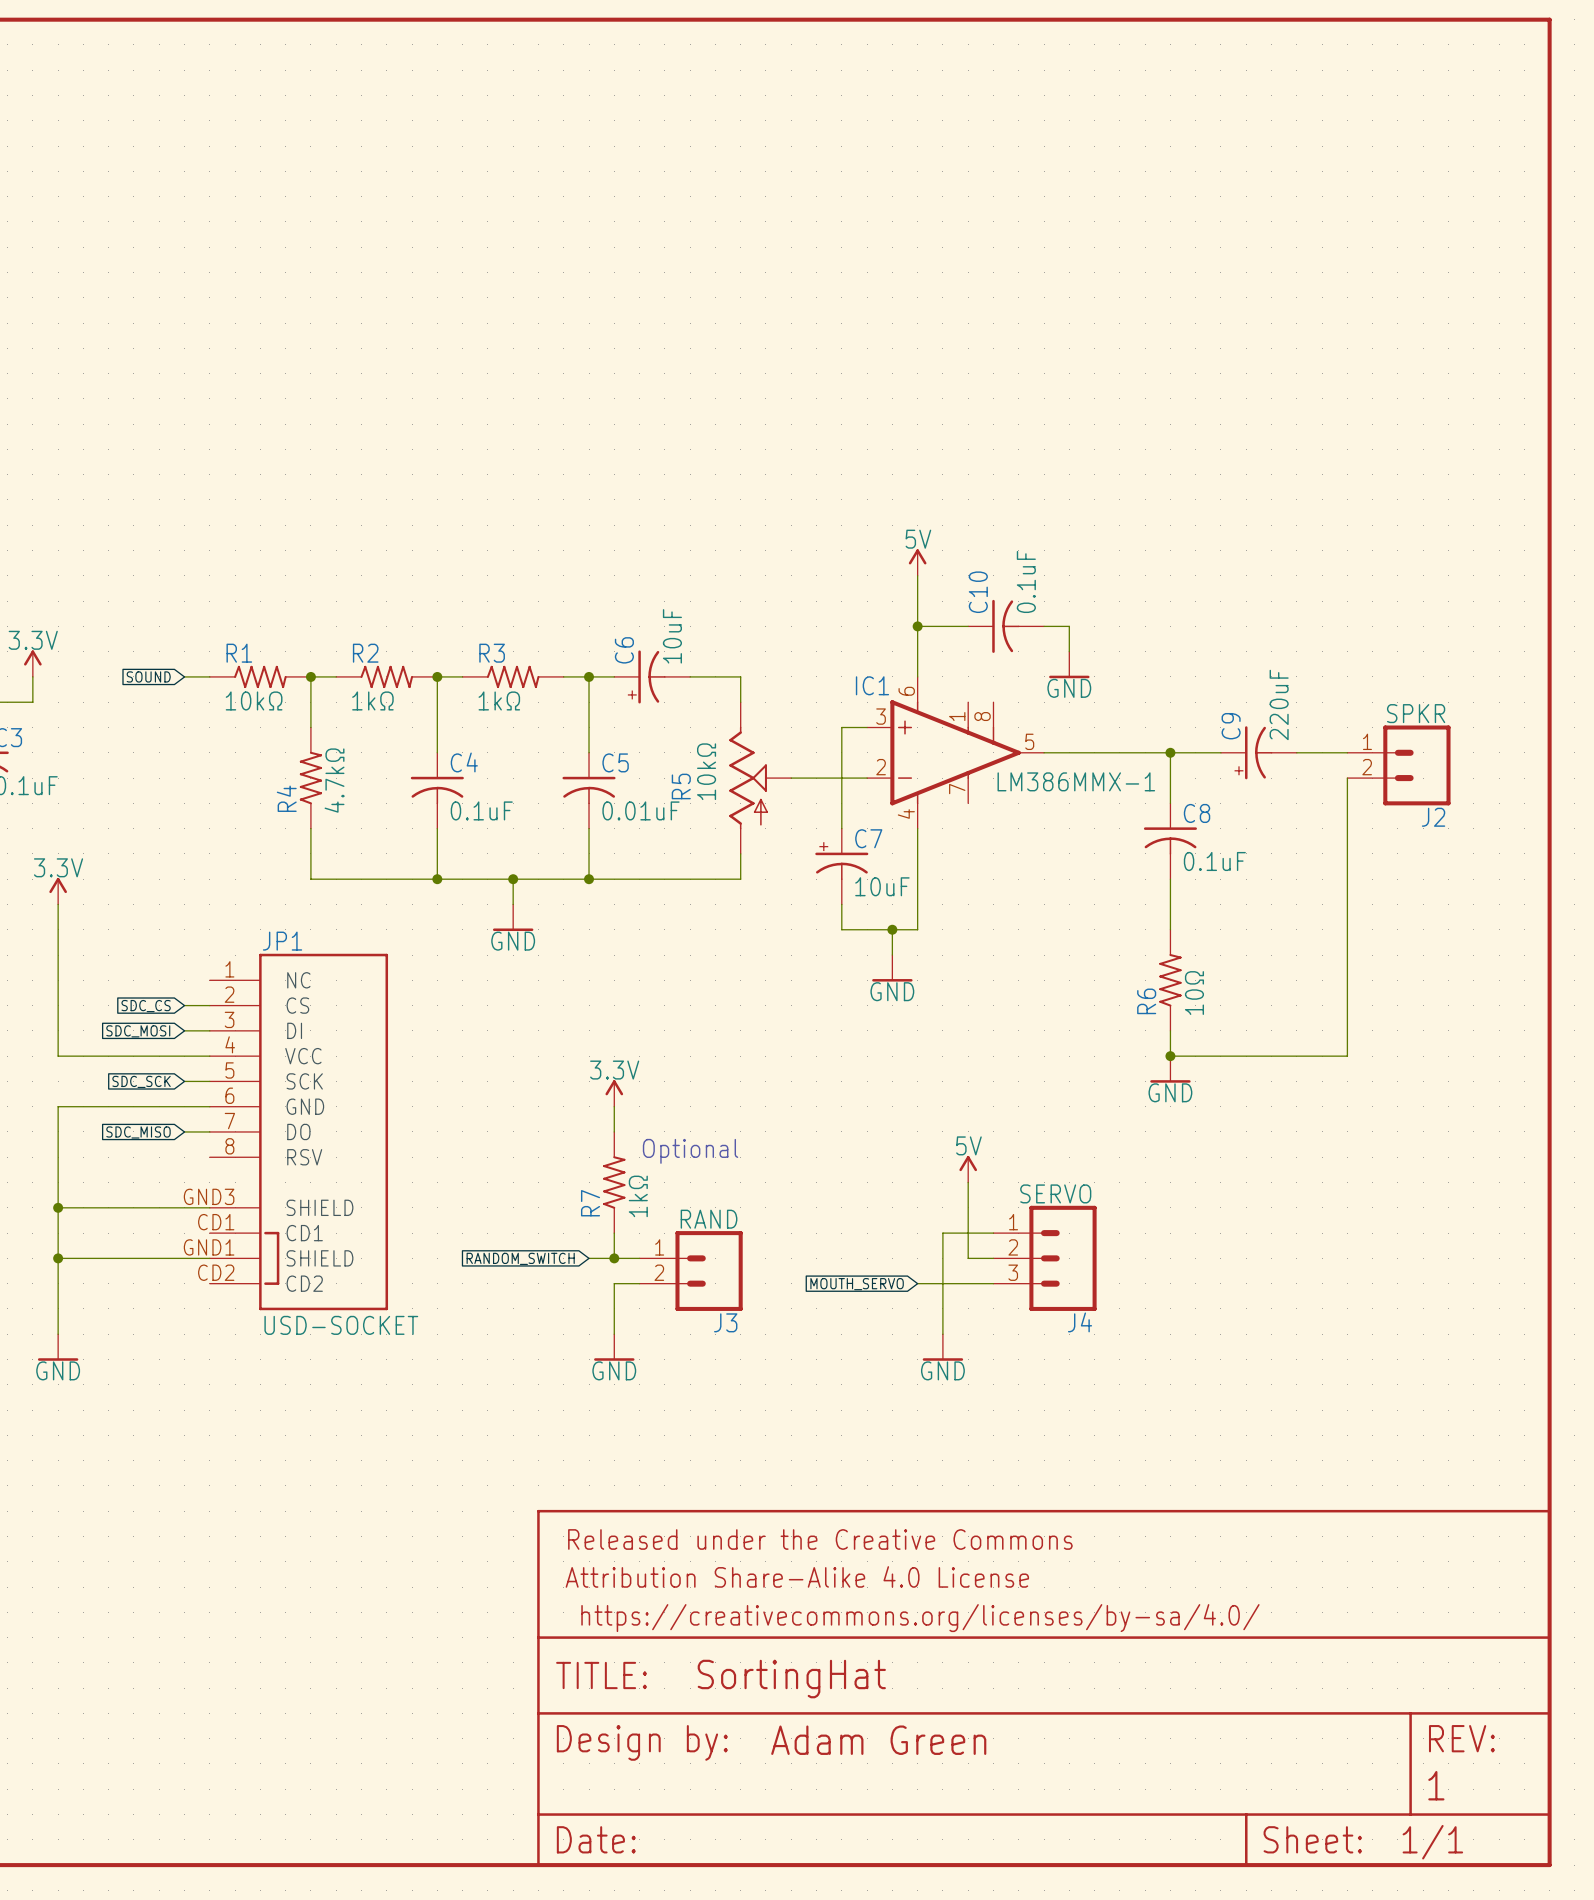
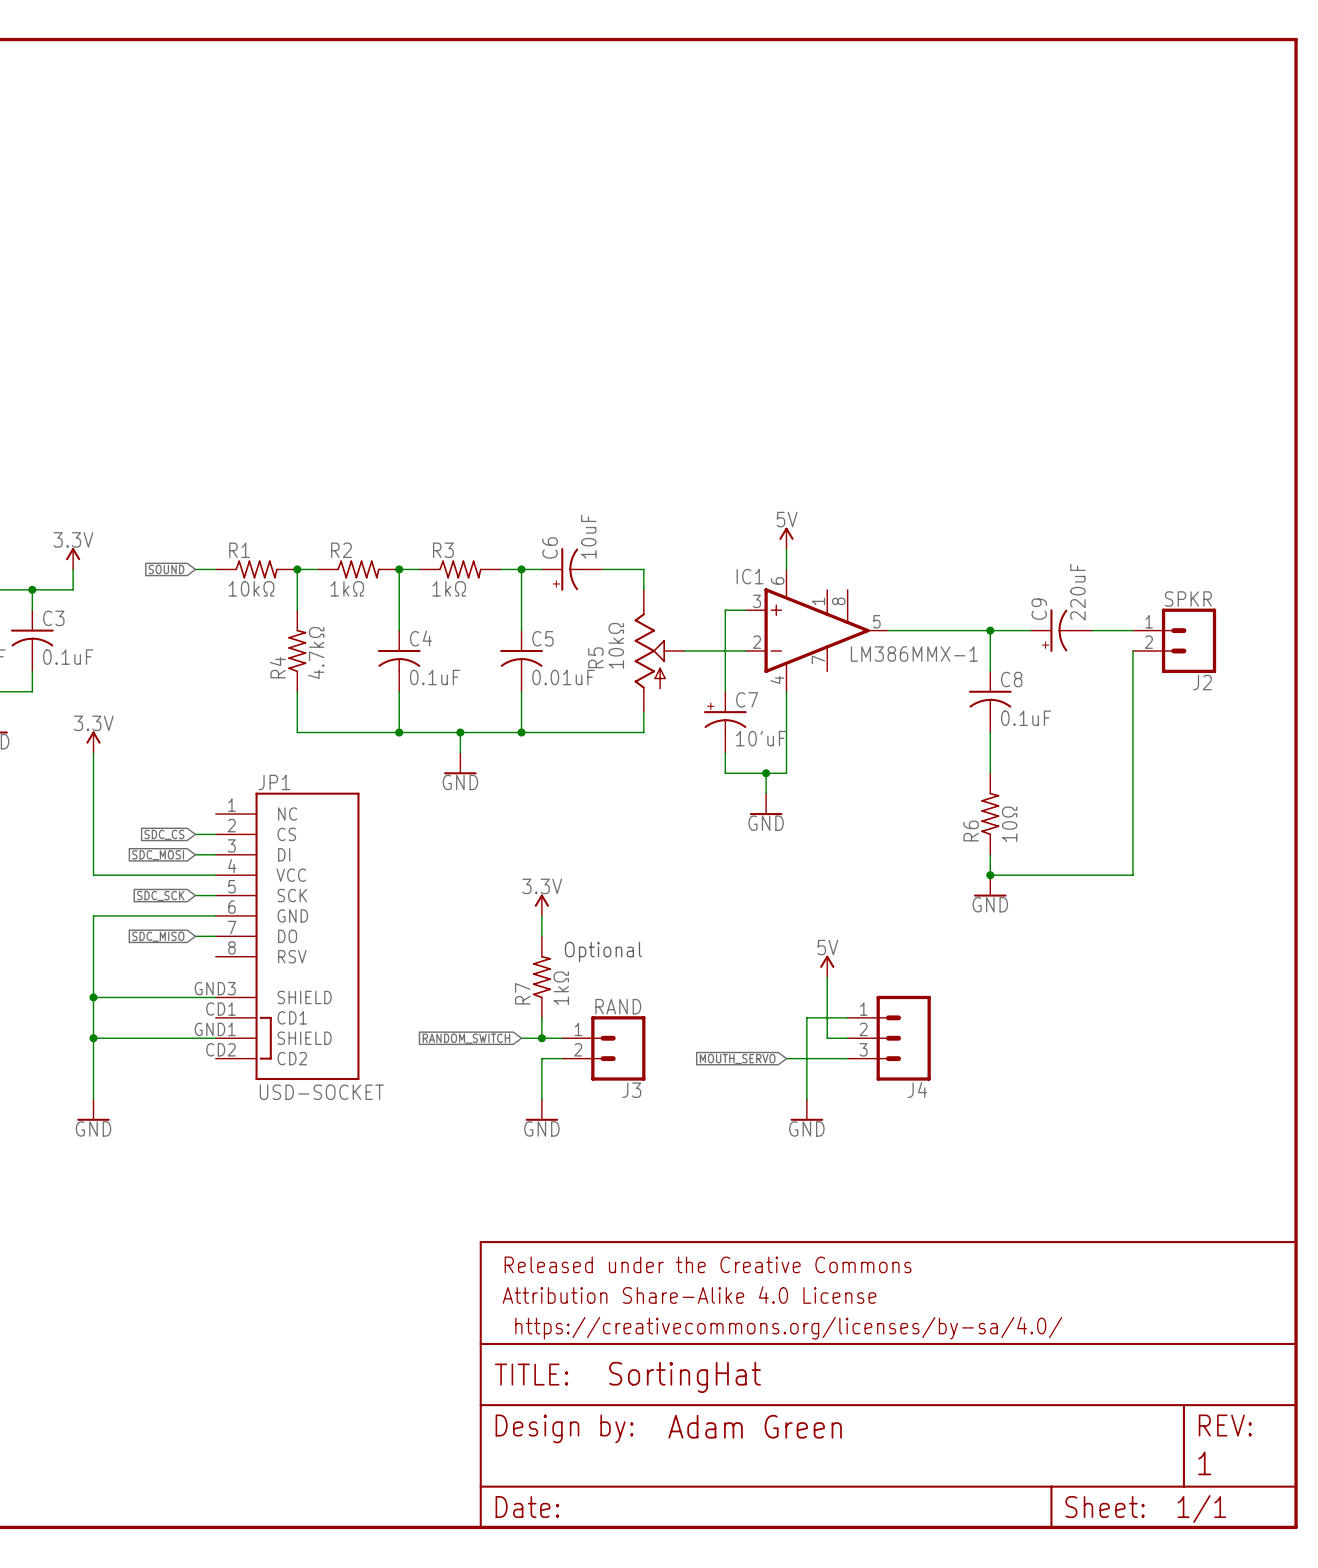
power symbol position: 5V (917, 562) -> 5V (786, 538)
wire: (917, 575) (917, 651) -> none
wire: (917, 626) (968, 626) -> none
junction: (917, 626) -> none
C10: 0.1uF (1006, 626) -> none
wire: (1044, 626) (1069, 626) (1069, 651) -> none
power symbol: GND (1069, 664) -> none
C7 value: 10uF (882, 886) -> 10'uF (761, 738)
J4 value: SERVO (1055, 1193) -> none

